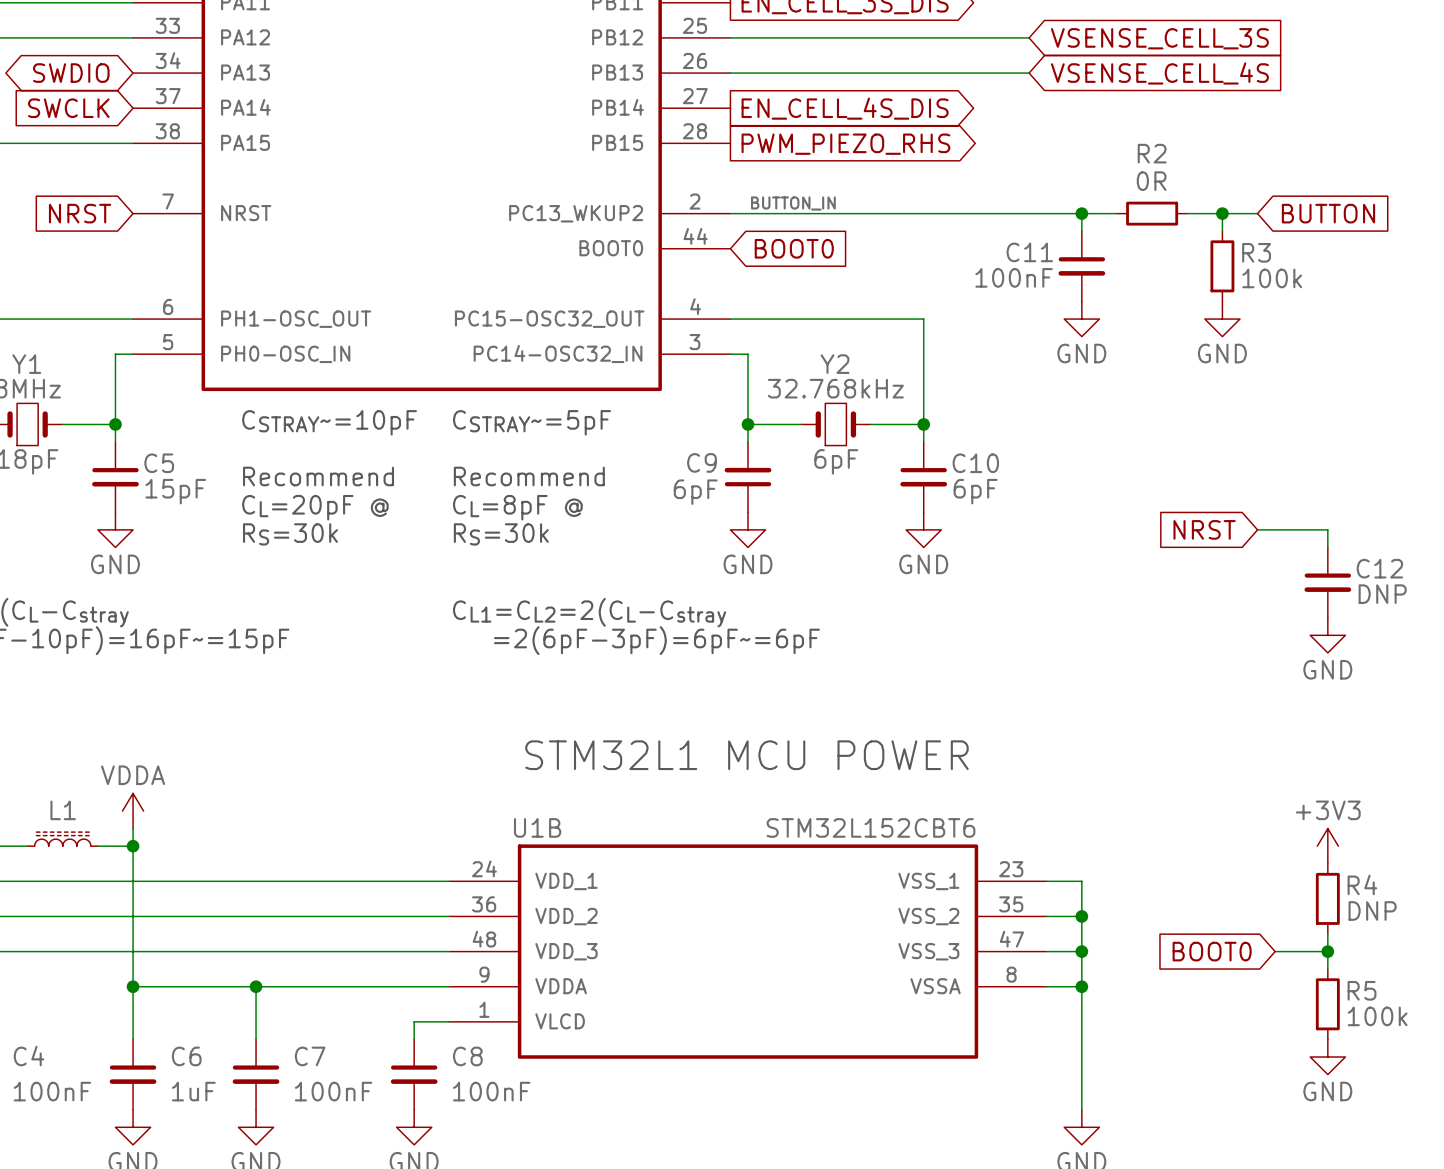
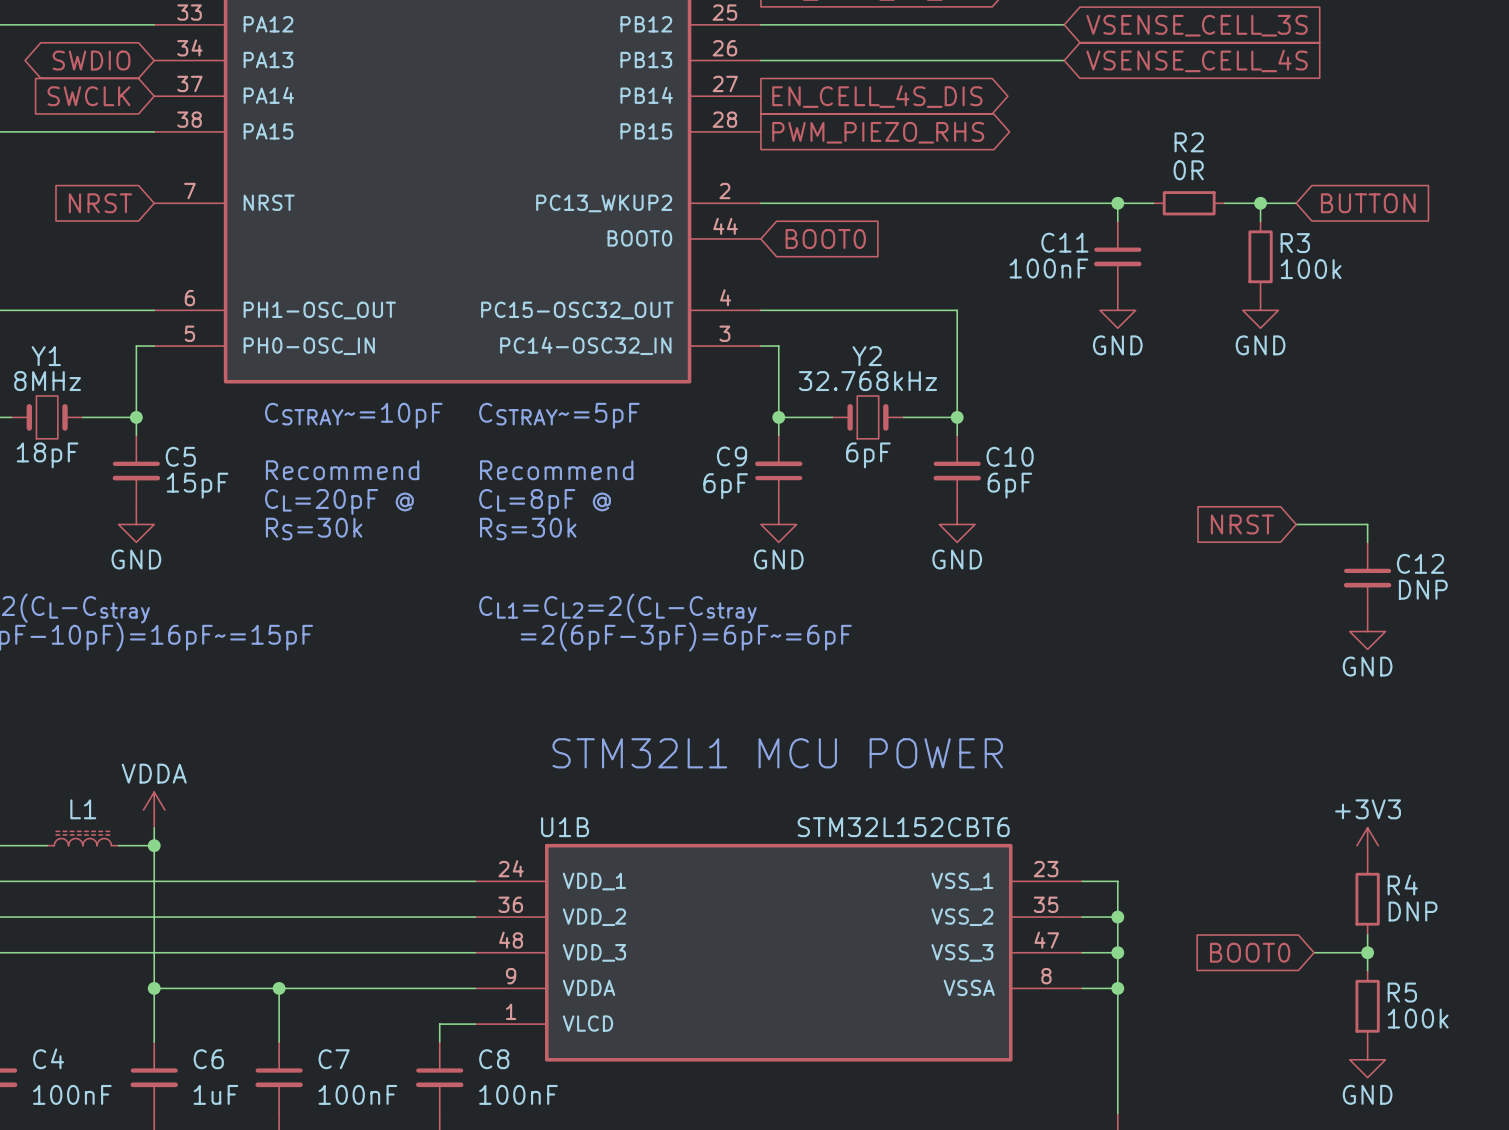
label: BUTTON_IN (793, 203) -> none

